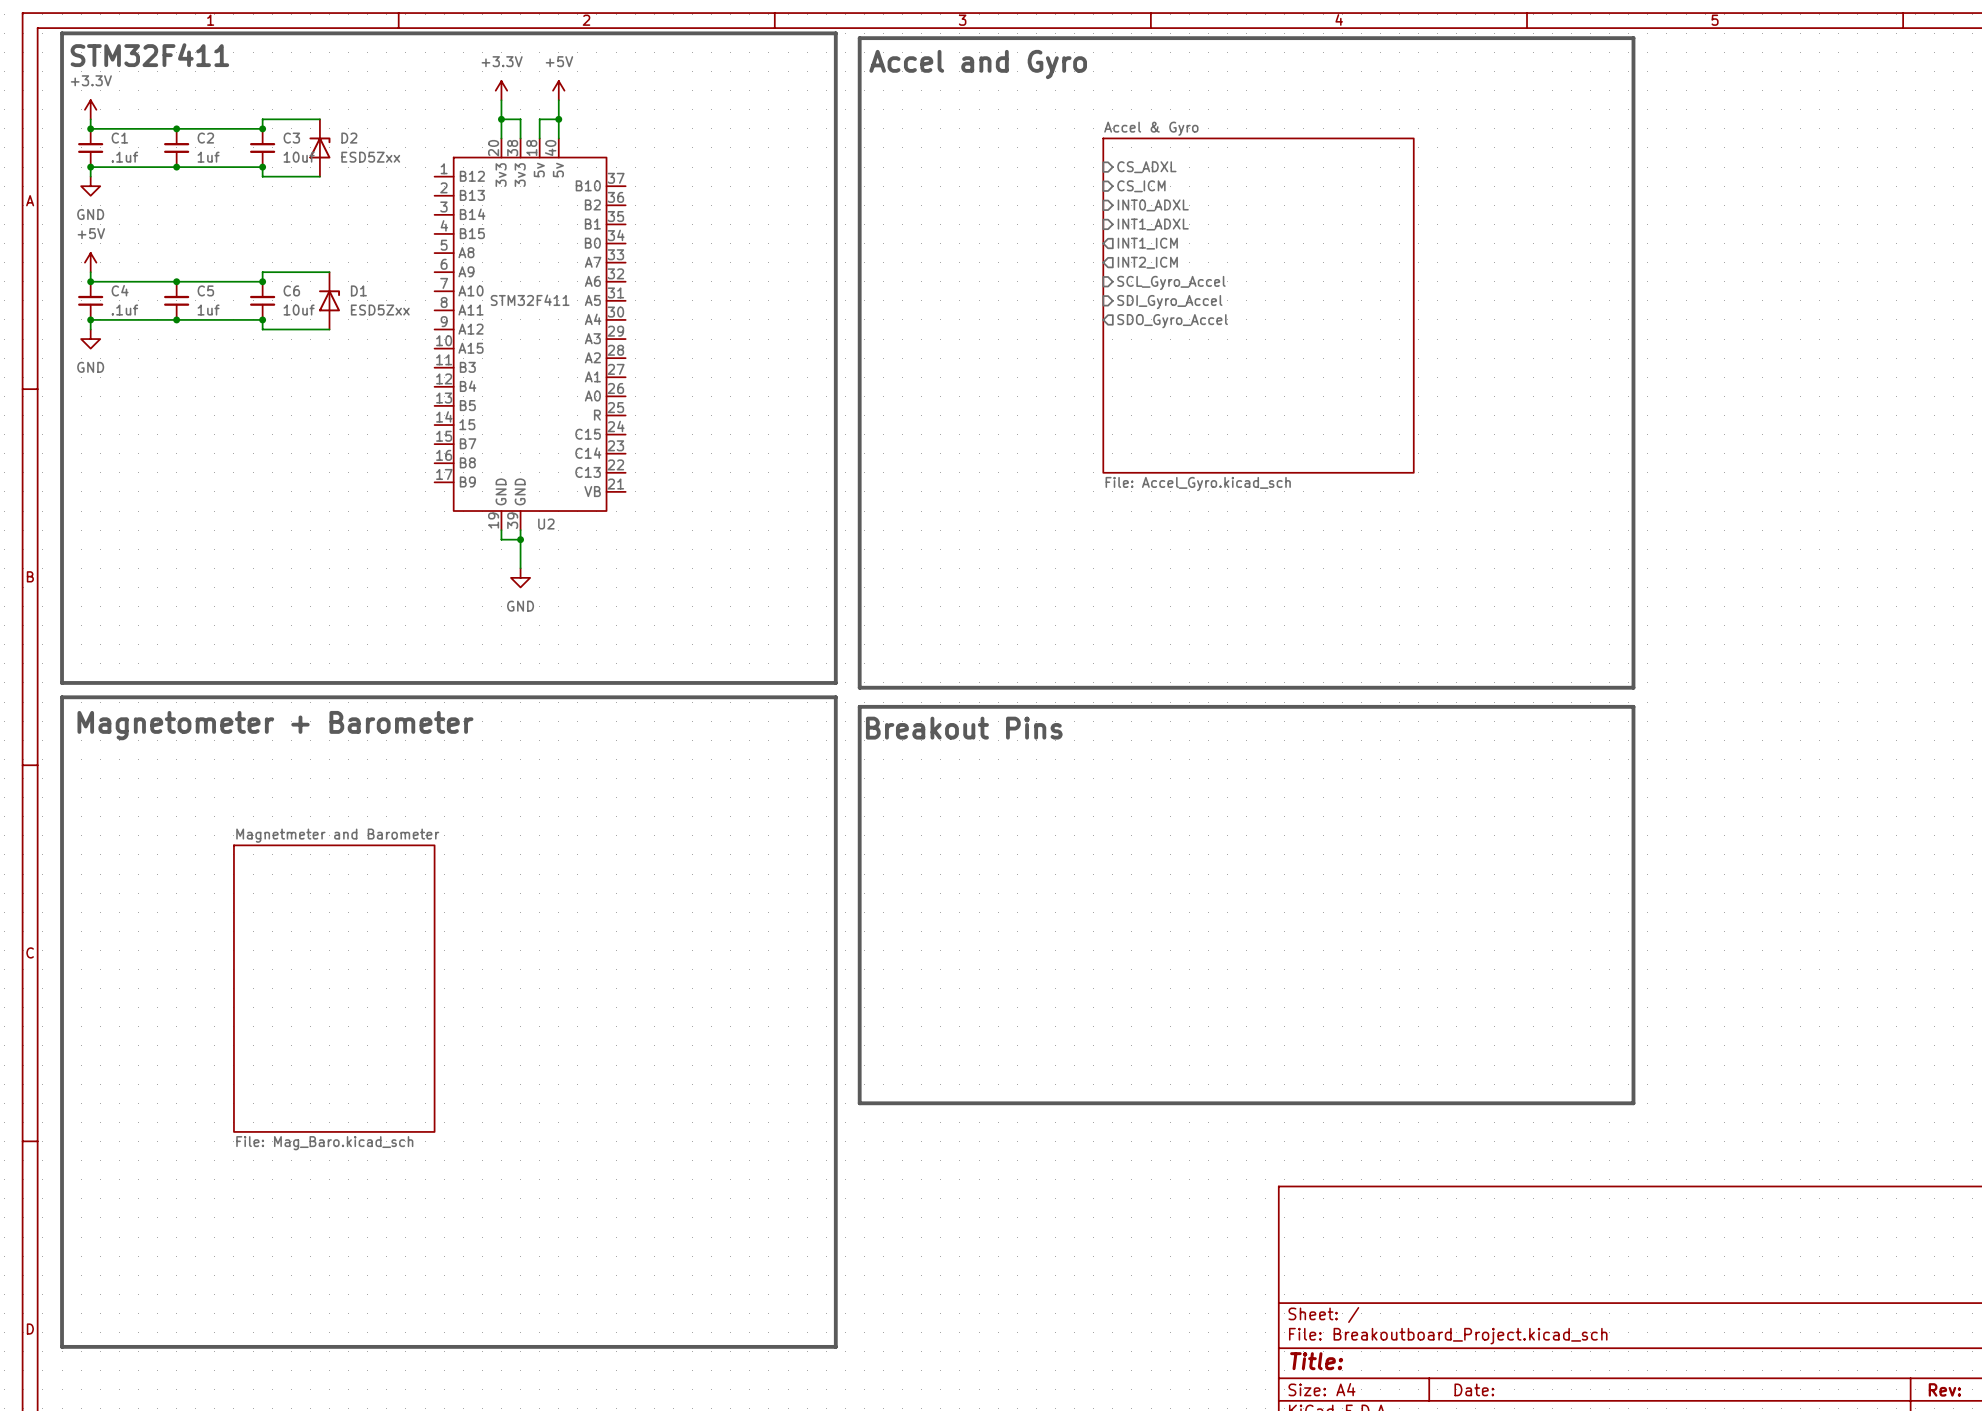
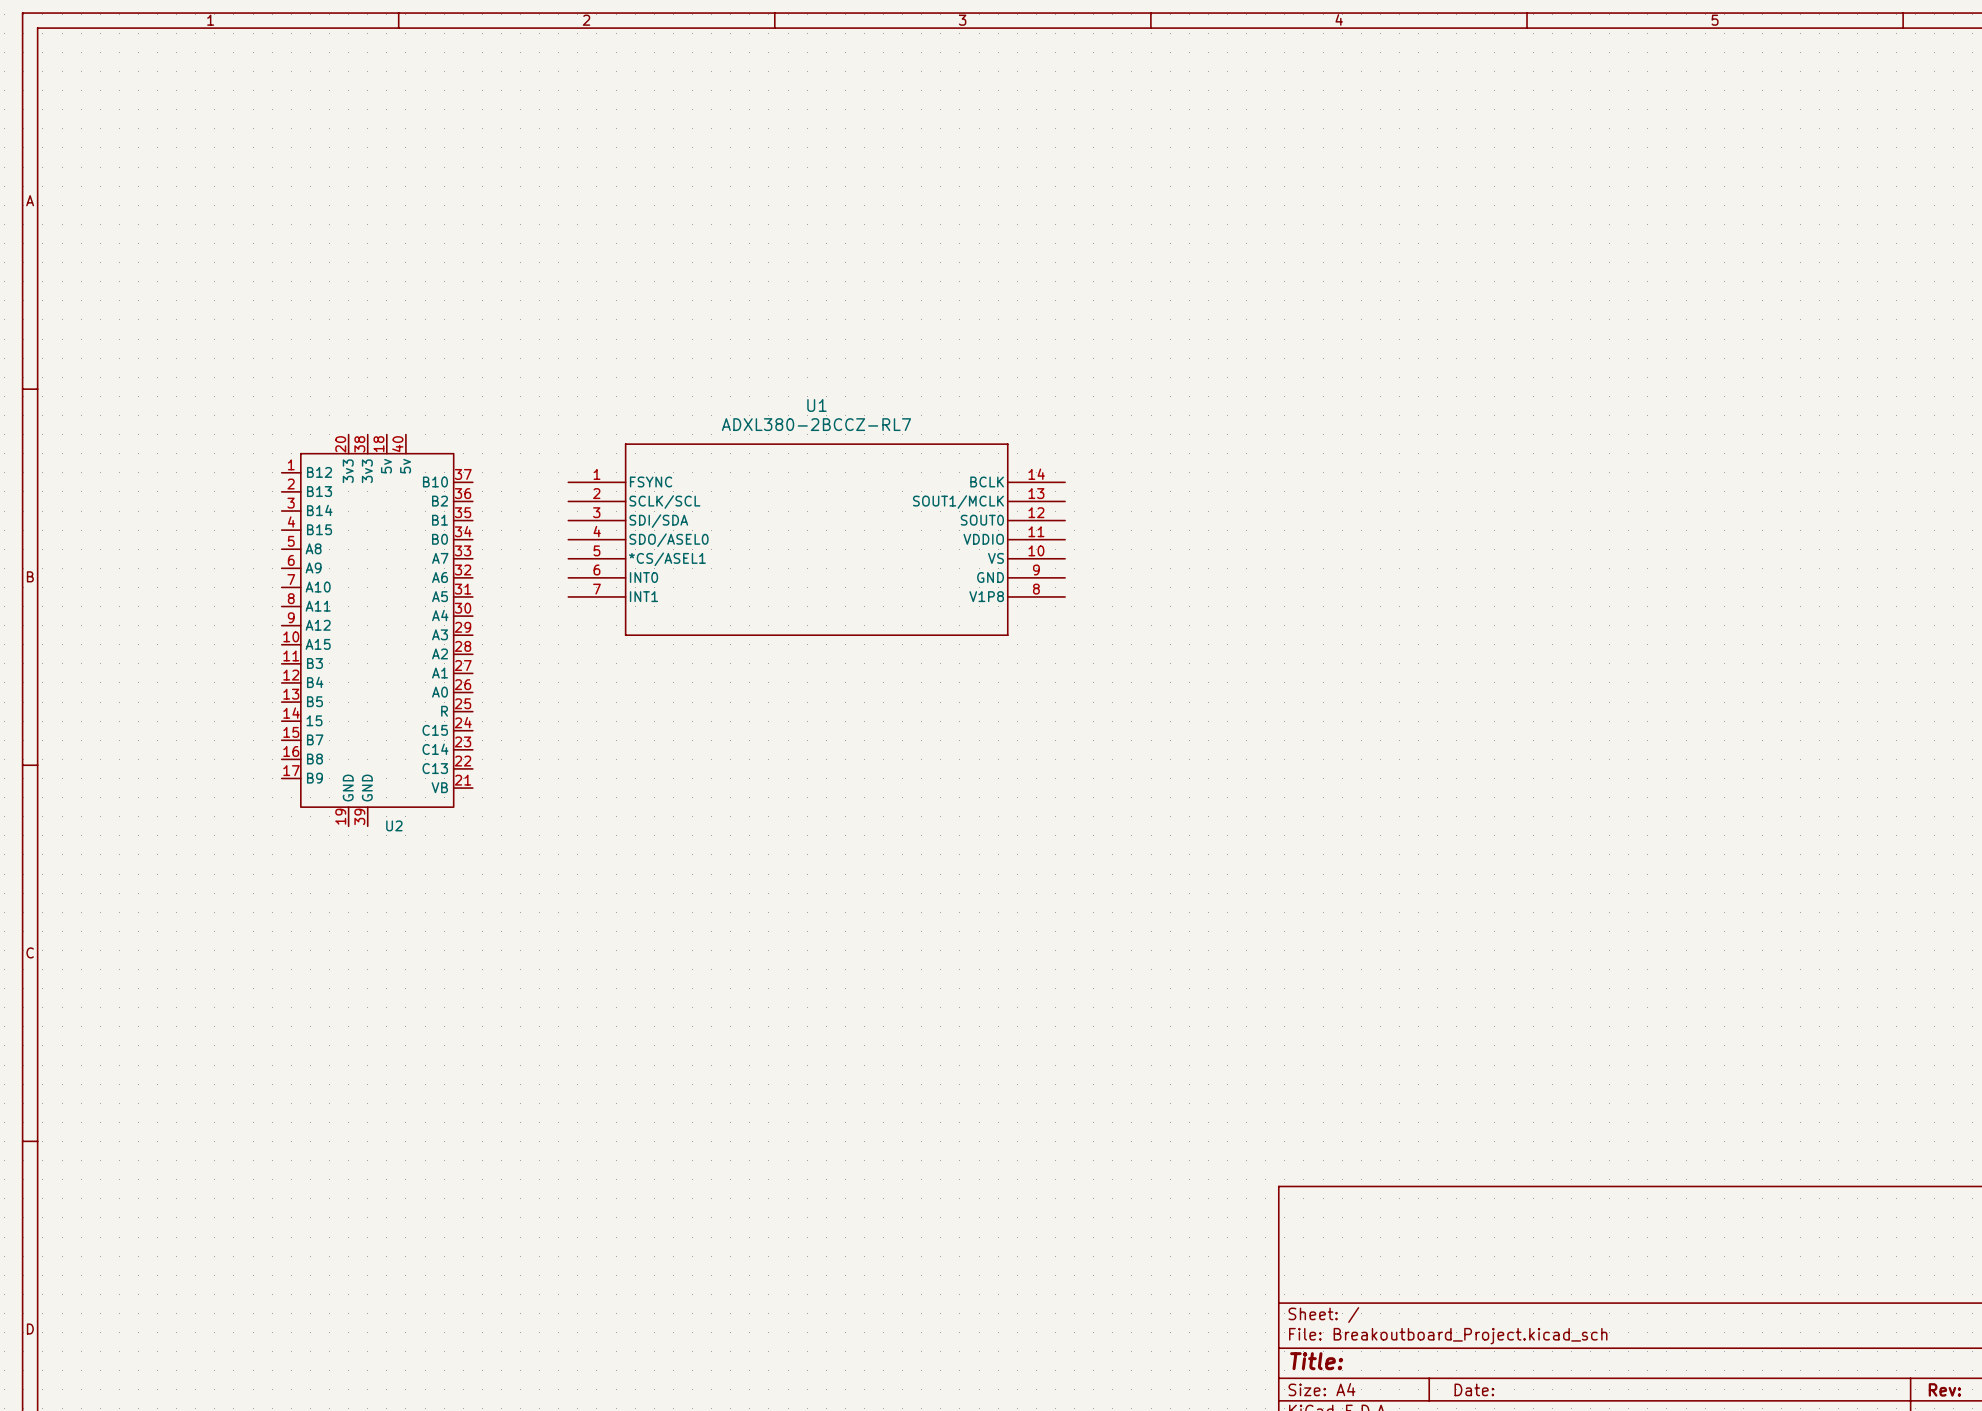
line: (62, 33) (835, 33) (835, 682) (62, 682) (62, 33) -> none
line: (859, 38) (1633, 38) (1633, 687) (859, 687) (859, 38) -> none
text: STM32F411 (149, 55) -> none
text: Accel and Gyro (978, 64) -> none
power symbol: +3.3V (501, 90) -> none
power symbol: +5V (558, 90) -> none
wire: (501, 100) (501, 138) -> none
wire: (558, 100) (558, 138) -> none
power symbol: +3.3V (90, 109) -> none
wire: (90, 119) (90, 128) (262, 128) (262, 119) (319, 119) -> none
wire: (501, 119) (520, 119) (520, 138) -> none
junction: (501, 119) -> none
wire: (558, 119) (539, 119) (539, 138) -> none
junction: (558, 119) -> none
junction: (90, 128) -> none
junction: (176, 128) -> none
junction: (262, 128) -> none
C1: .1uf (90, 147) -> none
C2: 1uf (176, 147) -> none
C3: 10uf (262, 147) -> none
D2: ESD5Zxx (319, 147) -> none
junction: (90, 167) -> none
junction: (176, 167) -> none
junction: (262, 167) -> none
sheet pin: CS_ADXL (1146, 167) -> none
wire: (90, 176) (90, 167) (262, 167) (262, 176) (319, 176) -> none
power symbol: GND (90, 186) -> none
sheet pin: CS_ICM (1141, 186) -> none
sheet pin: INT0_ADXL (1153, 205) -> none
sheet pin: INT1_ADXL (1153, 224) -> none
sheet pin: INT1_ICM (1147, 243) -> none
power symbol: +5V (90, 262) -> none
sheet pin: INT2_ICM (1147, 262) -> none
wire: (90, 272) (90, 281) (262, 281) (262, 272) (329, 272) -> none
junction: (90, 281) -> none
junction: (176, 281) -> none
junction: (262, 281) -> none
sheet pin: SCL_Gyro_Accel (1171, 282) -> none
C4: .1uf (90, 300) -> none
C5: 1uf (176, 300) -> none
C6: 10uf (262, 300) -> none
D1: ESD5Zxx (329, 300) -> none
U2 value: STM32F411 (530, 300) -> none
sheet pin: SDI_Gyro_Accel (1169, 302) -> none
sheet Accel & Gyro: File: Accel_Gyro.kicad_sch (1258, 305) -> none
junction: (90, 319) -> none
junction: (176, 319) -> none
junction: (262, 319) -> none
sheet pin: SDO_Gyro_Accel (1172, 321) -> none
wire: (90, 329) (90, 319) (262, 319) (262, 329) (329, 329) -> none
U2 position: (530, 334) -> (377, 630)
power symbol: GND (90, 339) -> none
U2 name position: U2 (546, 524) -> U2 (394, 825)
wire: (501, 530) (501, 539) (520, 539) -> none
wire: (520, 530) (520, 568) -> none
junction: (520, 539) -> none
U1: none -> ADXL380-2BCCZ-RL7 (816, 539)
power symbol: GND (520, 577) -> none
line: (62, 697) (62, 1346) (835, 1346) (835, 697) (62, 697) -> none
line: (859, 706) (859, 1103) (1633, 1103) (1633, 706) (859, 706) -> none
text: Magnetometer + Barometer (275, 725) -> none
text: Breakout Pins (964, 728) -> none
sheet Magnetmeter and Barometer: File: Mag_Baro.kicad_sch (334, 988) -> none

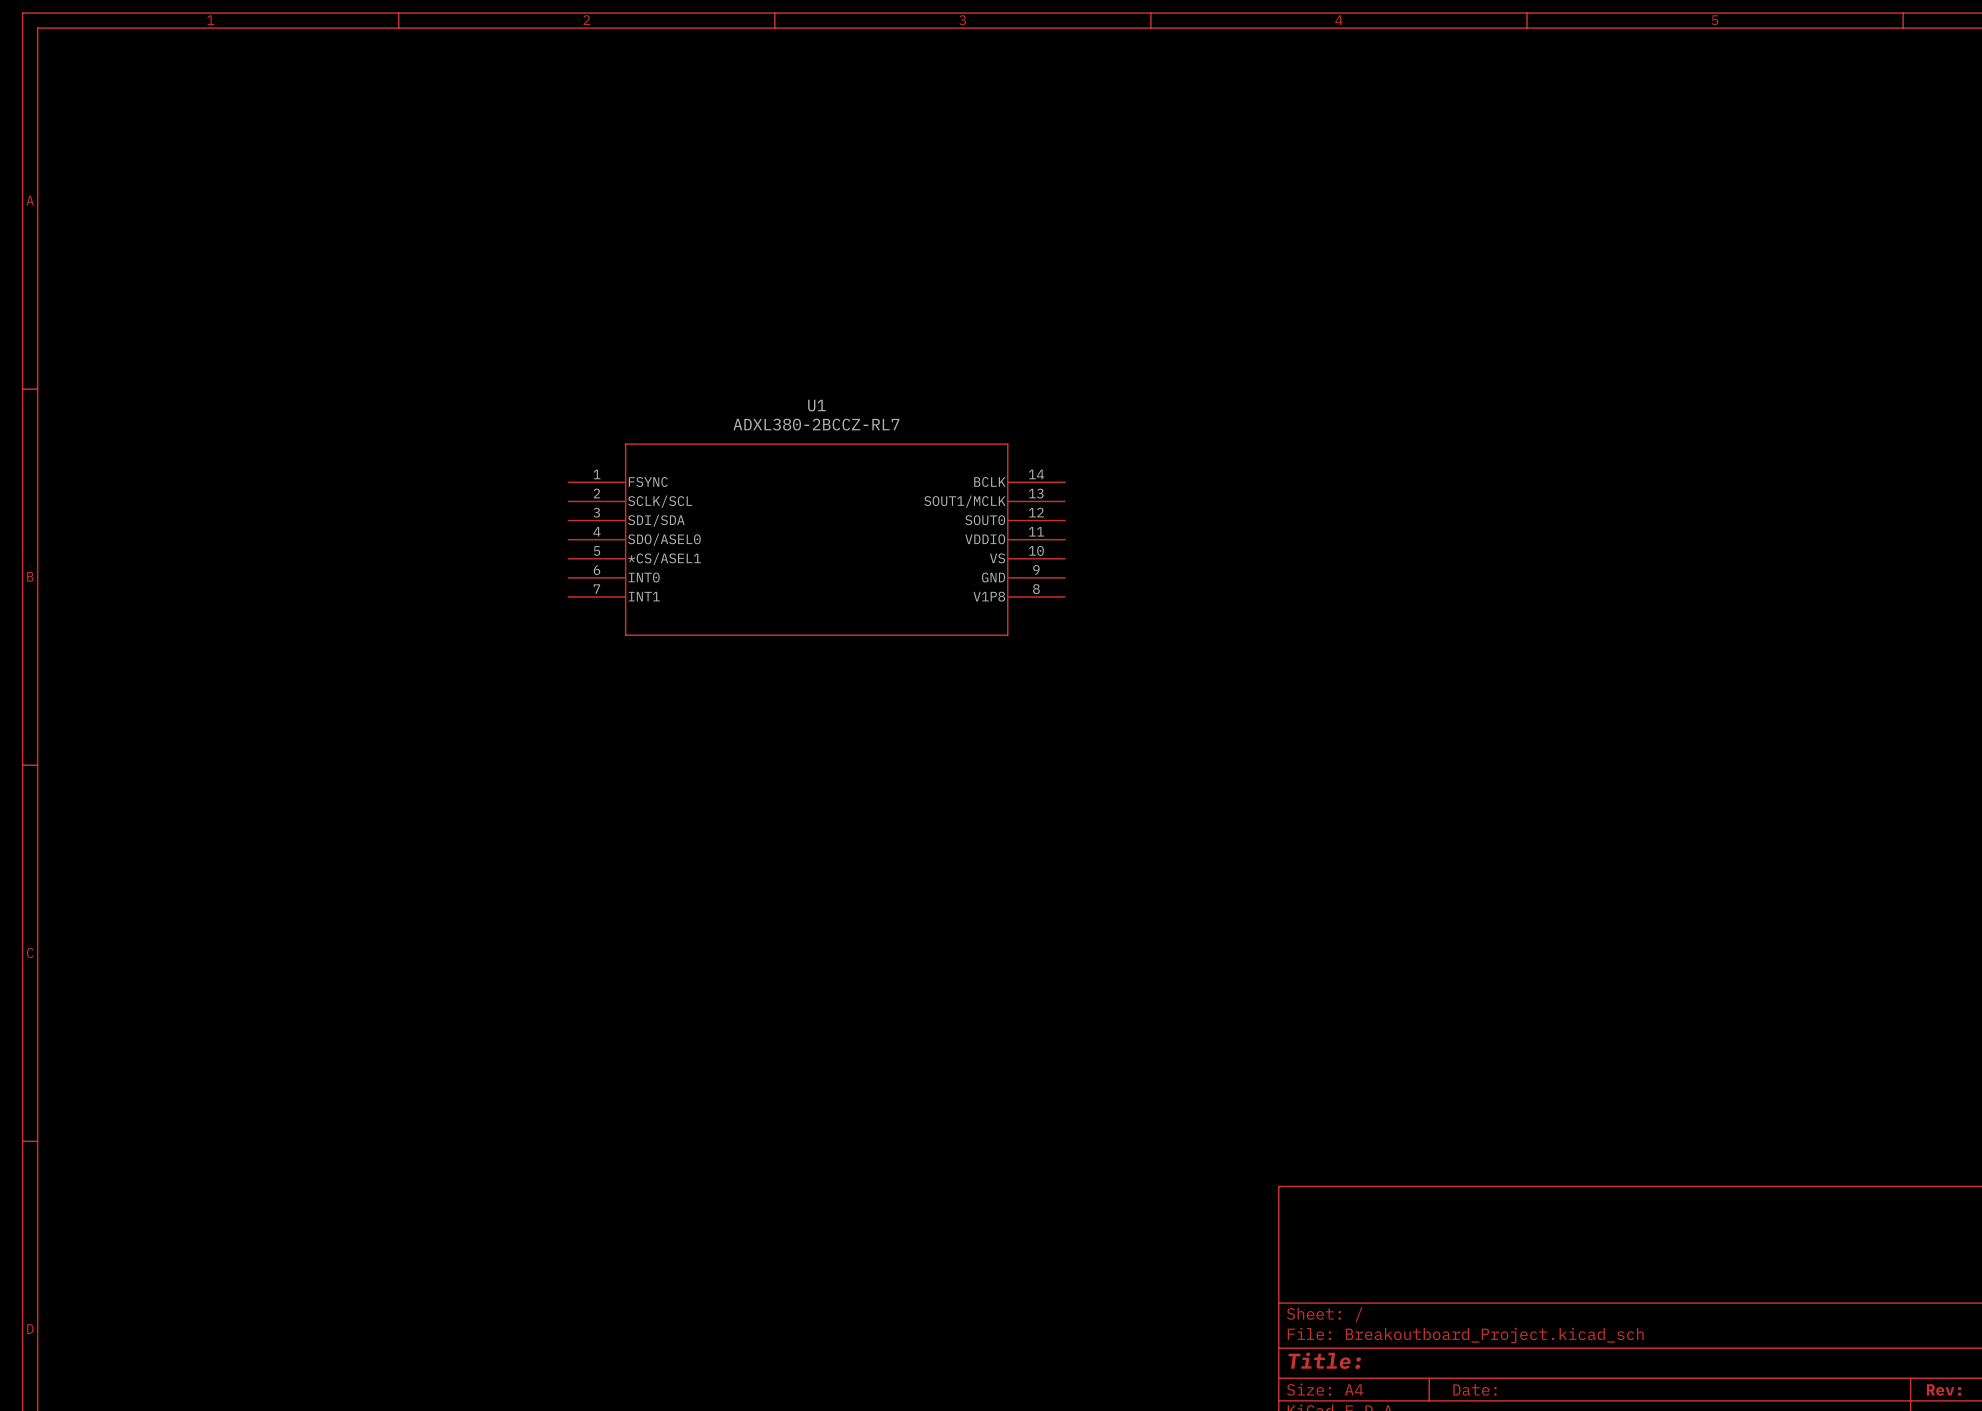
U2: (377, 630) -> none

